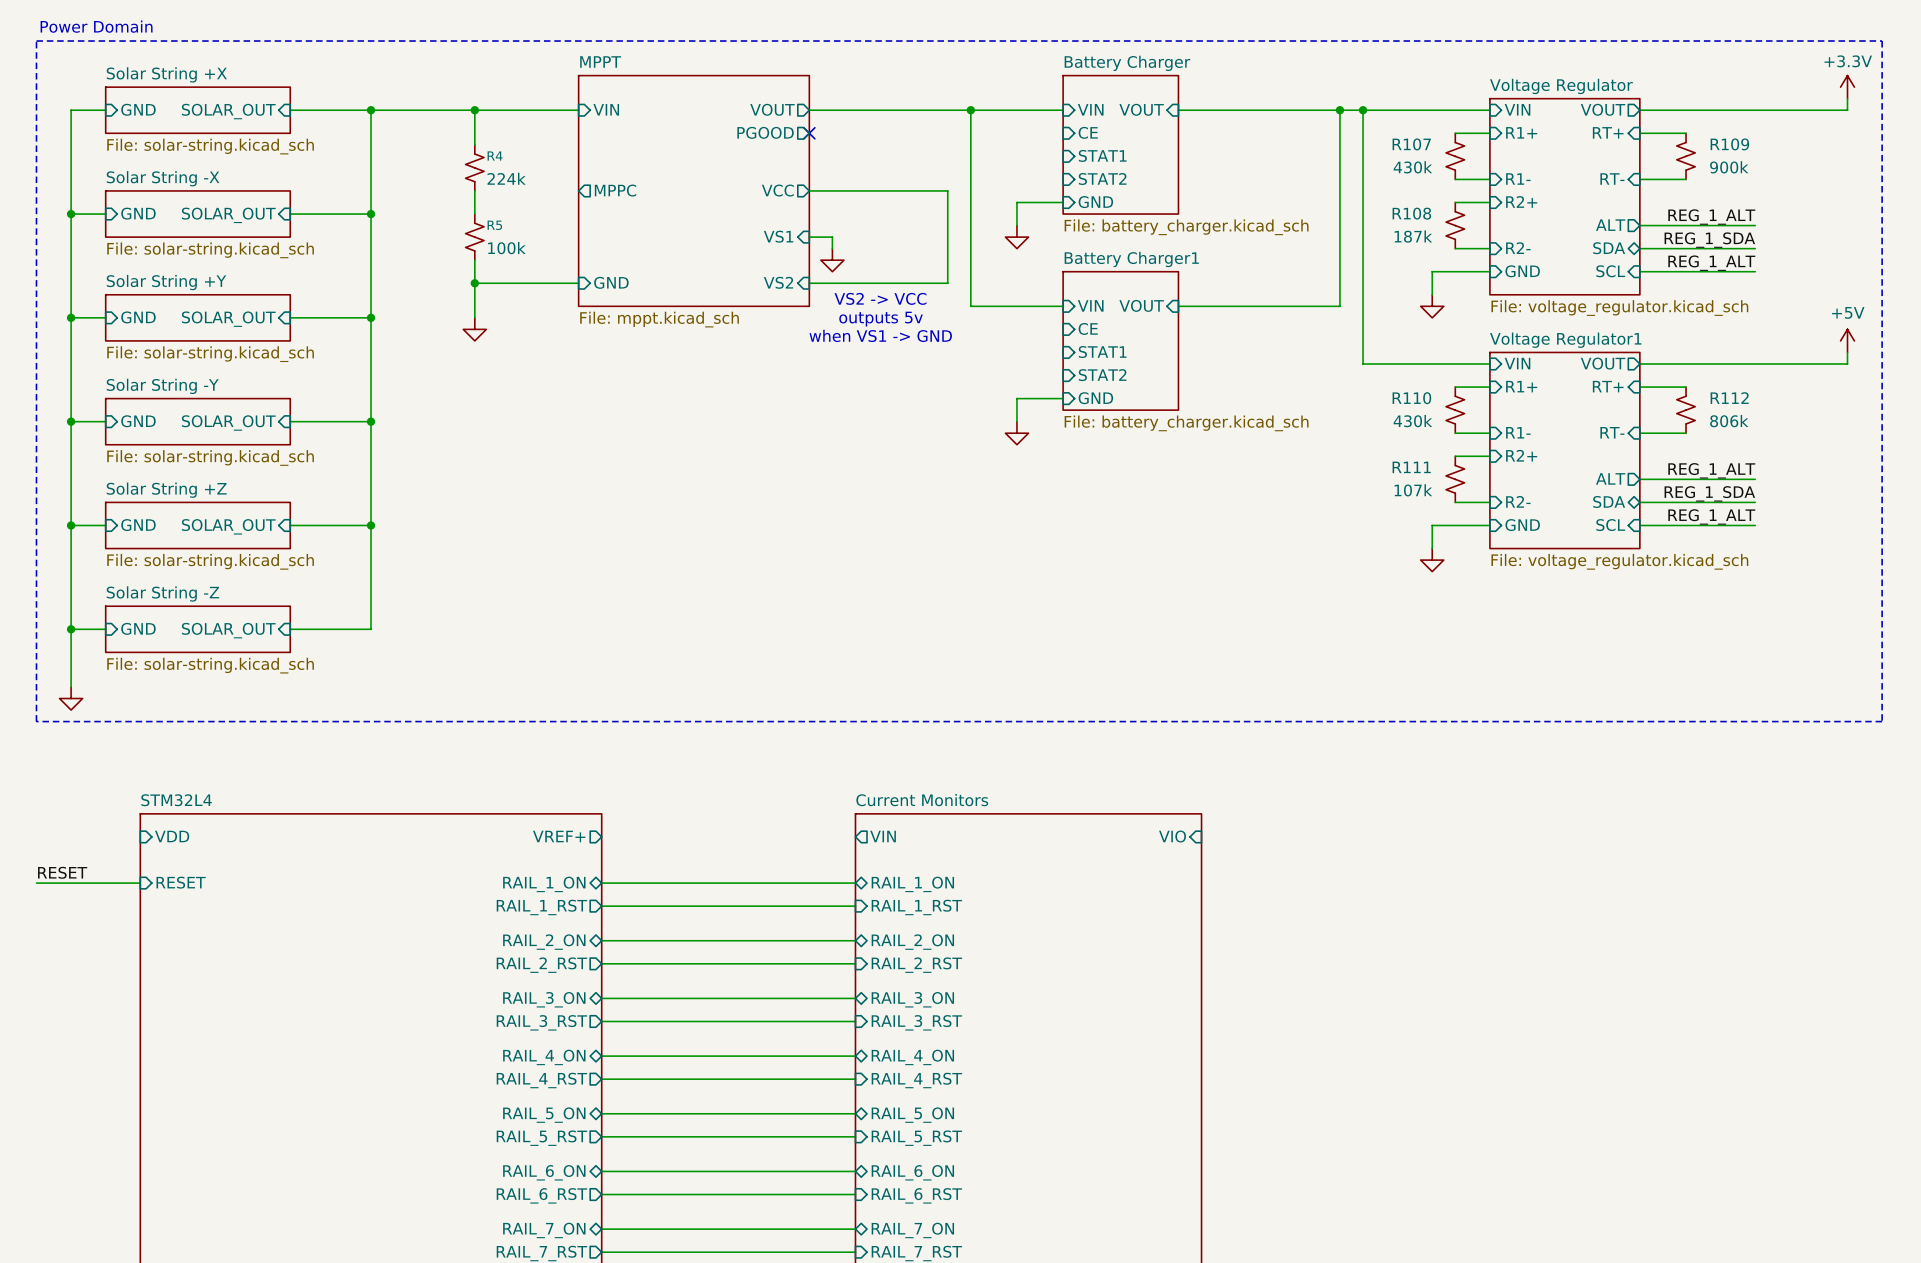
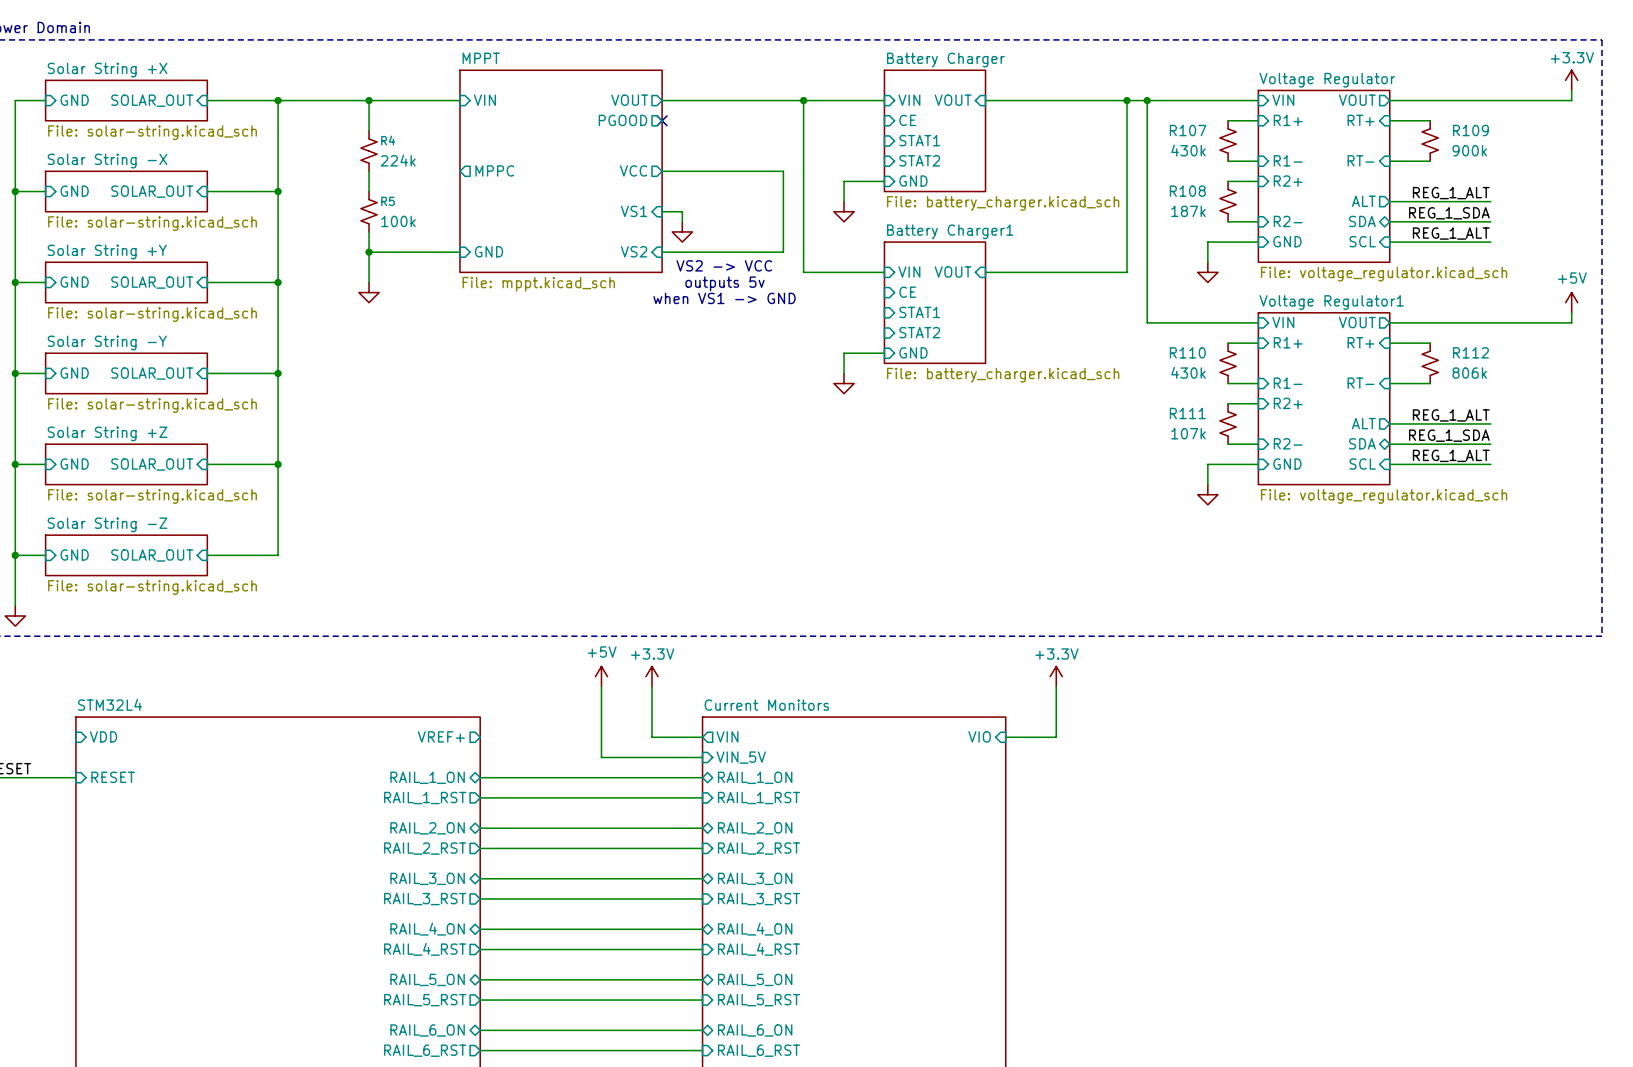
power symbol: none -> +5V (601, 676)
power symbol: none -> +3.3V (652, 676)
power symbol: none -> +3.3V (1056, 676)
wire: none -> (601, 686) (601, 757) (702, 757)
wire: none -> (652, 686) (652, 737) (702, 737)
wire: none -> (1056, 686) (1056, 737) (1005, 737)
sheet pin: none -> VIN_5V (741, 757)

